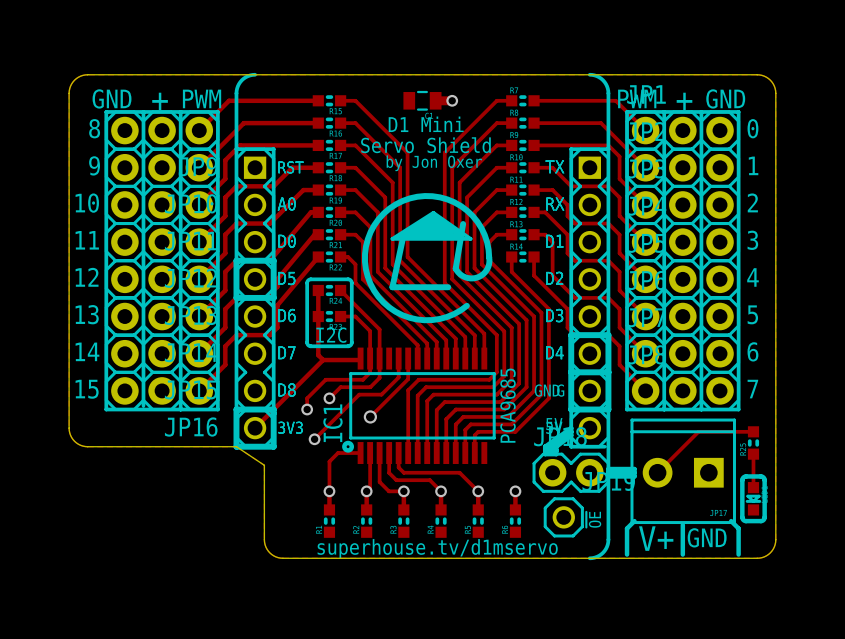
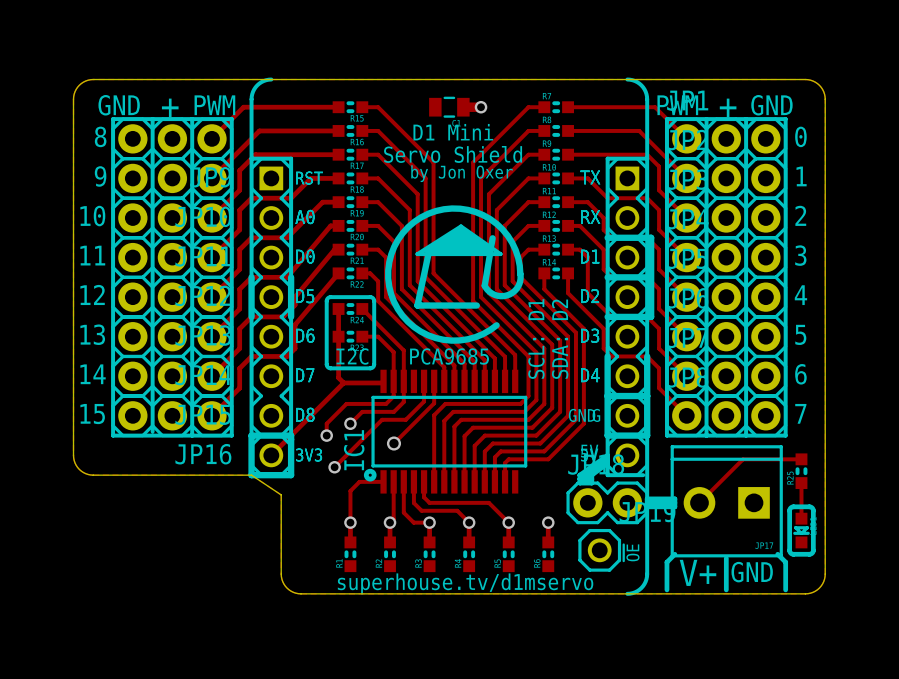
line: none -> (607, 237) (651, 237) (651, 316) (607, 316)
line: (236, 260) (273, 260) -> none
line: (236, 297) (273, 297) -> none
text: none -> SCL: D1 (536, 339)
text: none -> SDA: D2 (560, 339)
line: (571, 335) (608, 335) -> (607, 277) (647, 277)
text rotation: 0° (508, 405) -> 90° clockwise (449, 356)
text position: PCA9685 (508, 405) -> PCA9685 (449, 356)

